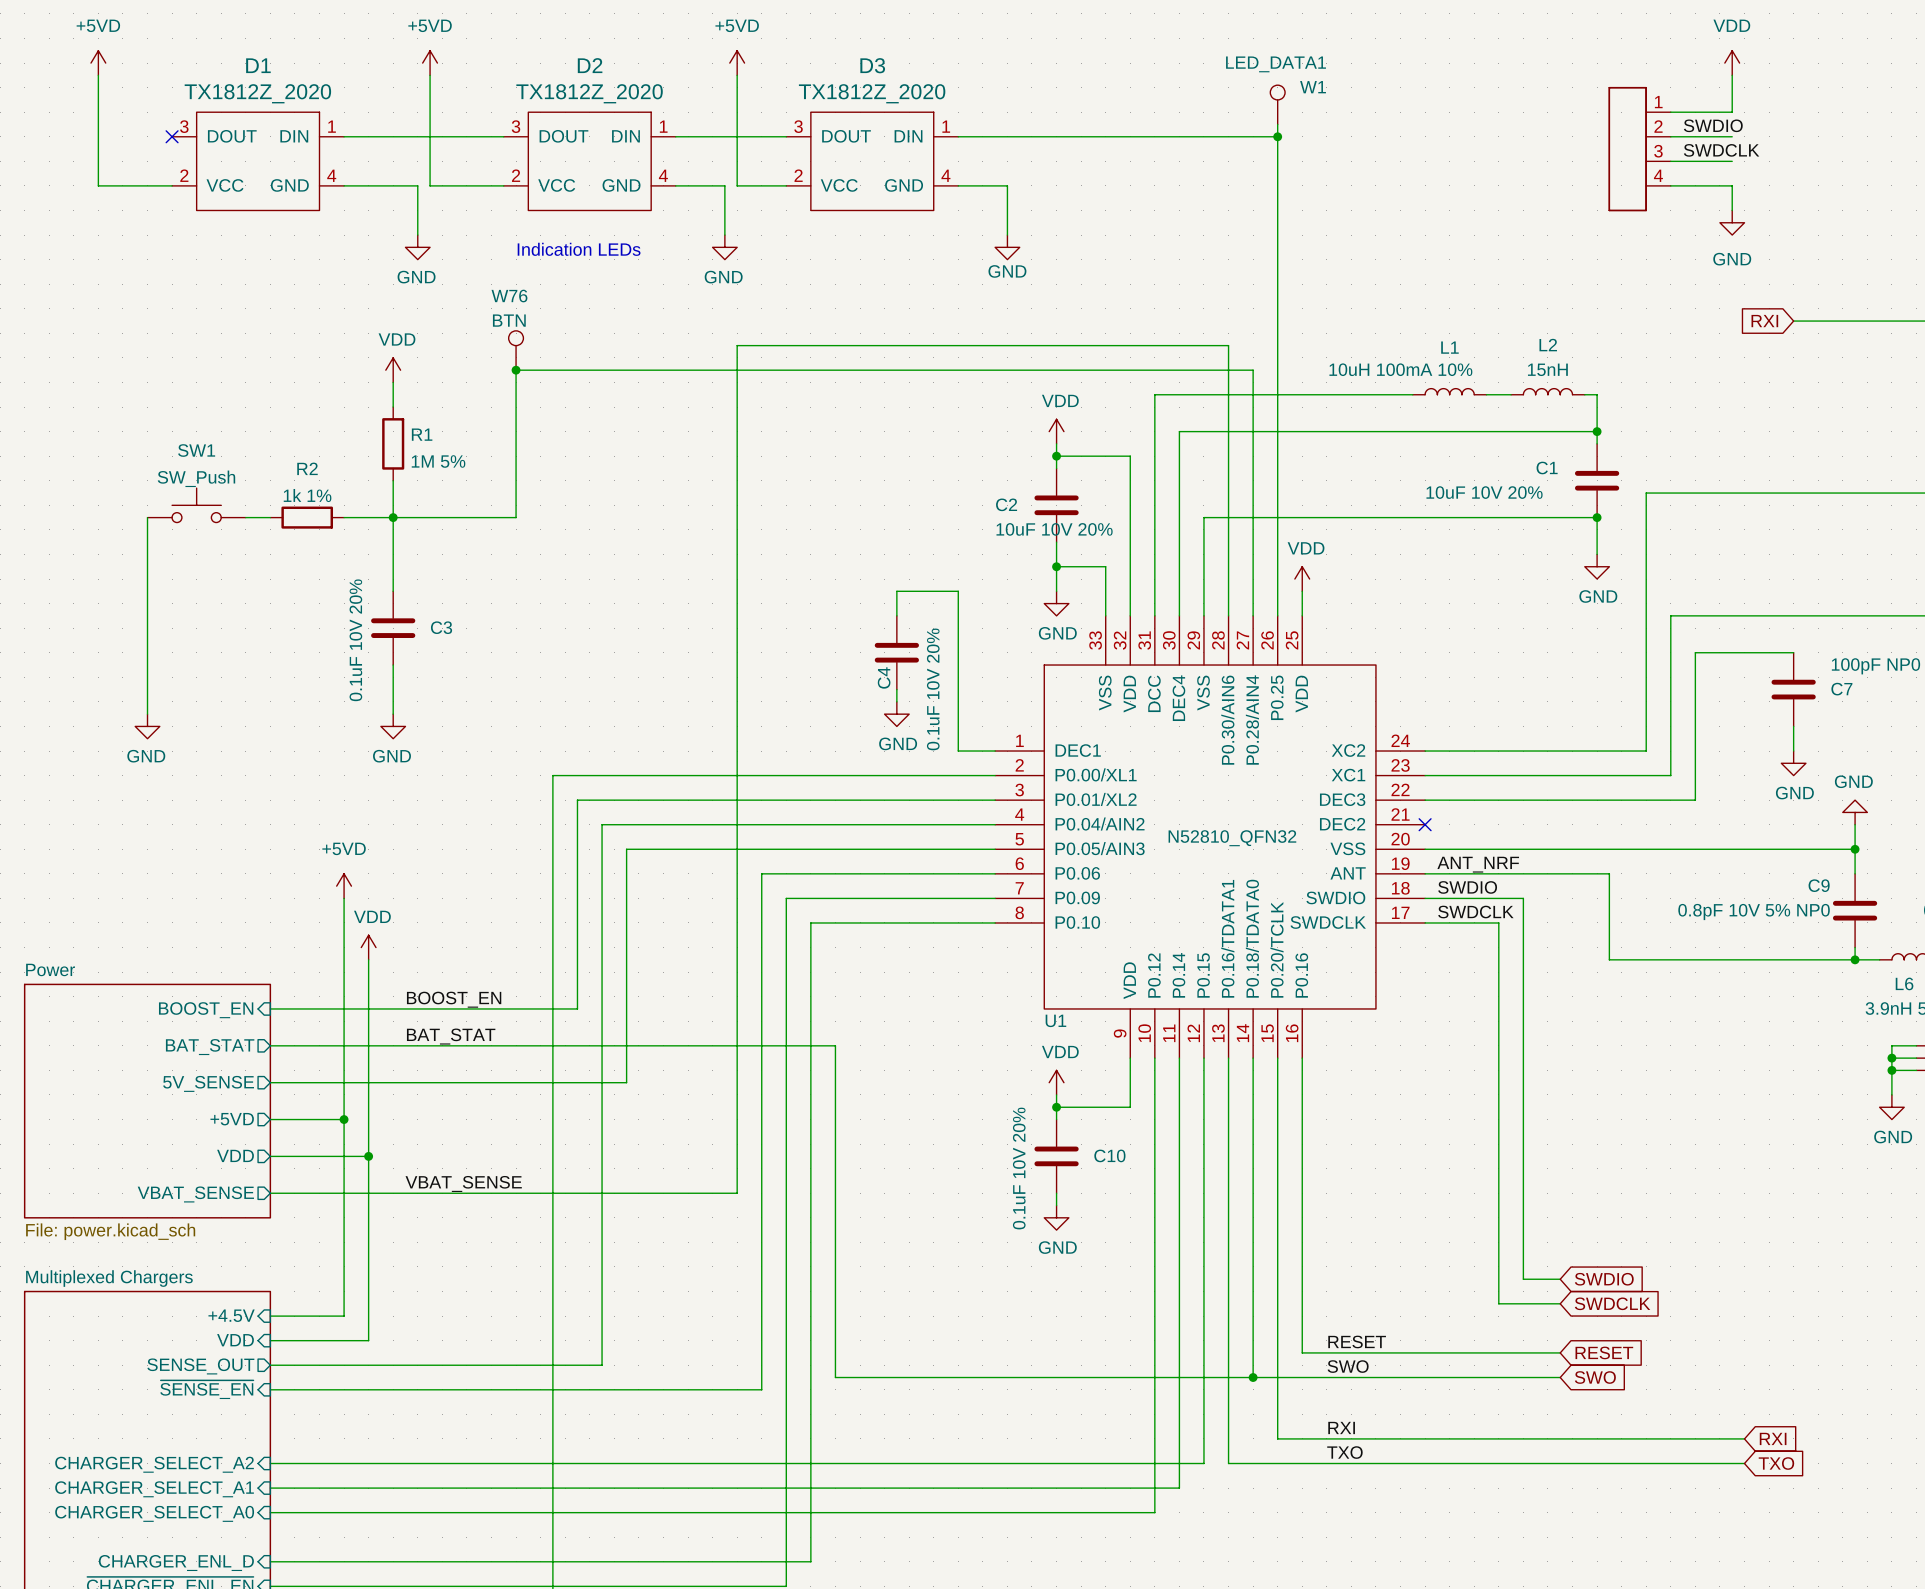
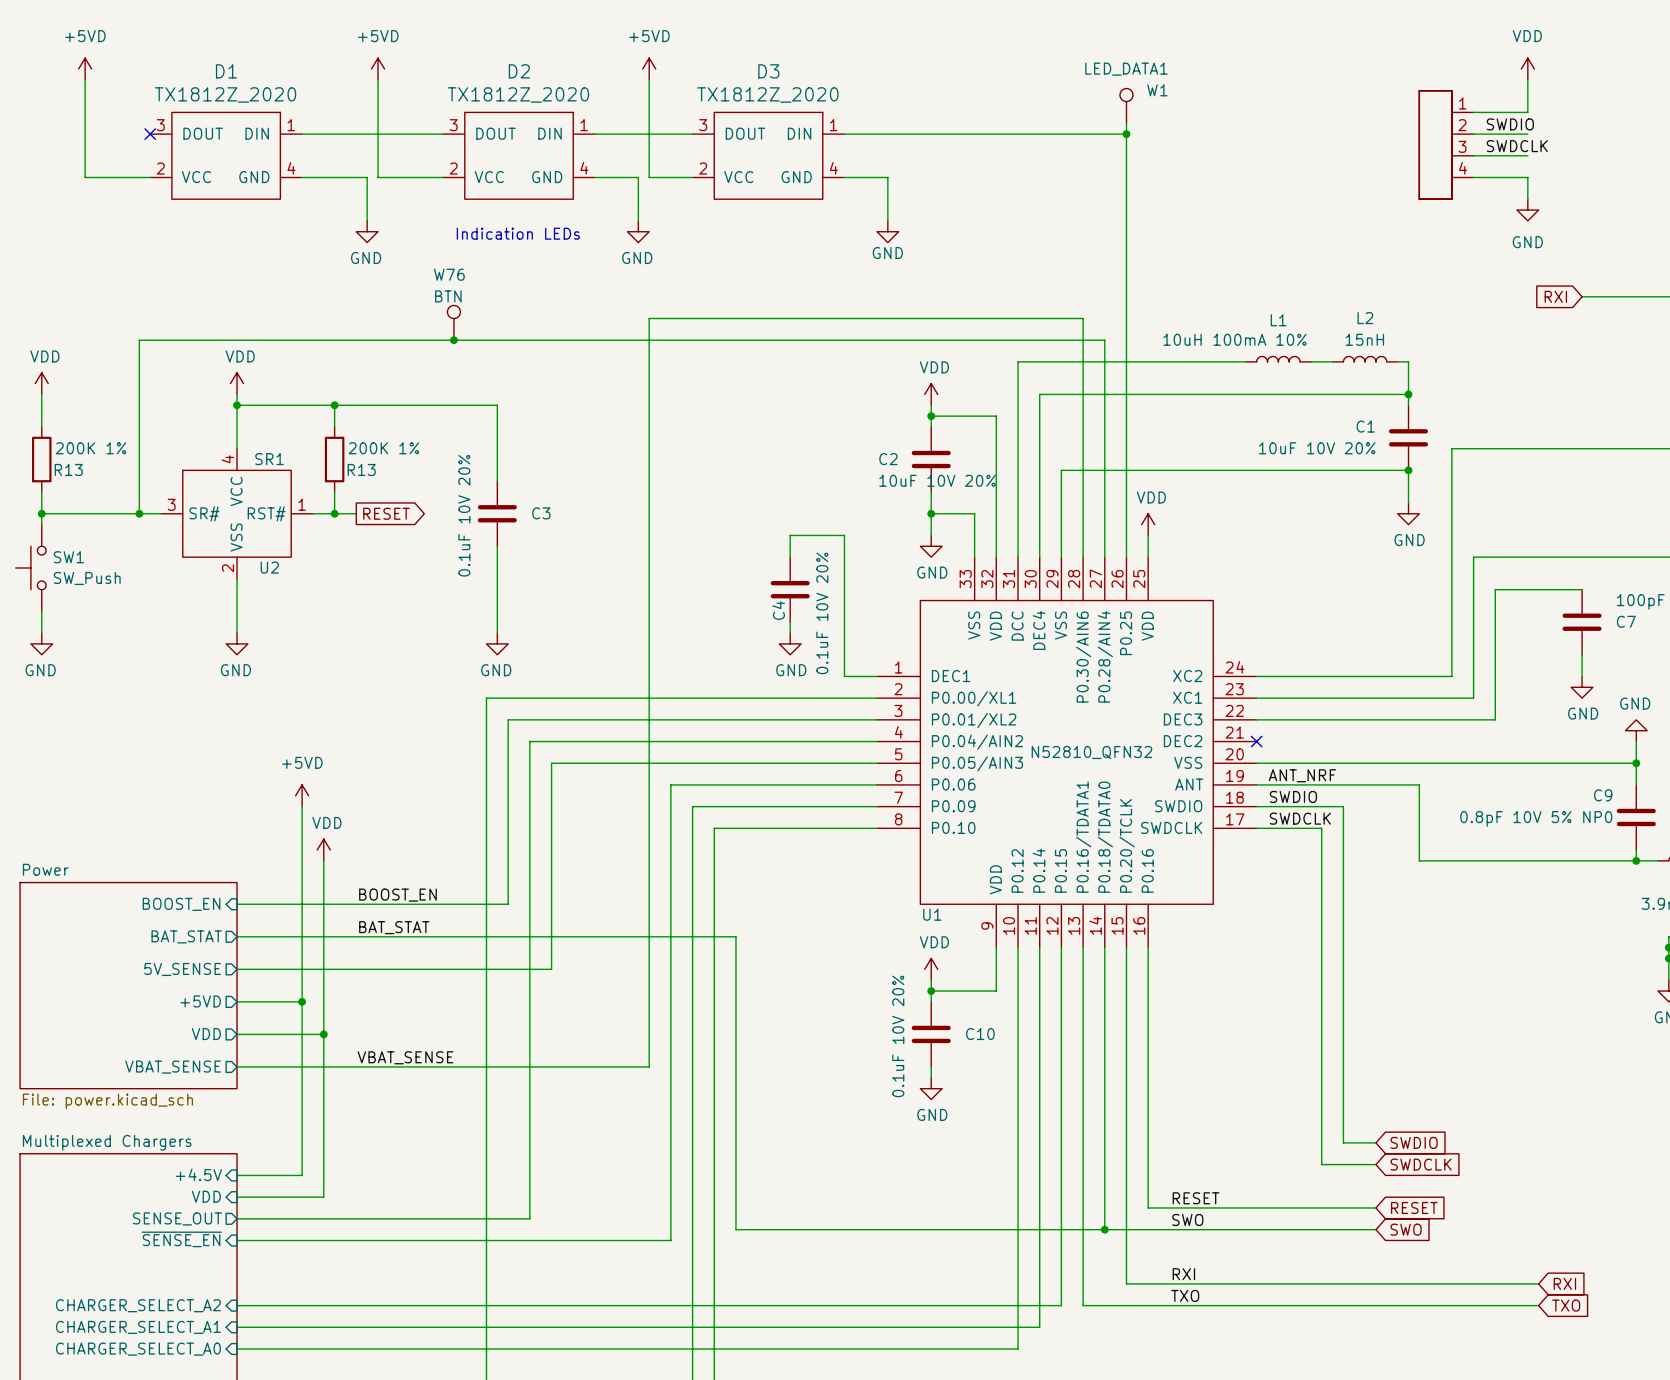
power symbol position: VDD (393, 370) -> VDD (237, 383)
wire: (516, 370) (516, 517) (344, 517) -> (453, 340) (139, 340) (139, 513)
wire: (393, 382) (393, 407) -> (334, 405) (334, 426)
power symbol: none -> VDD (41, 383)
wire: none -> (41, 394) (41, 426)
wire: none -> (237, 394) (237, 448)
wire: none -> (237, 405) (497, 405) (497, 481)
junction: none -> (237, 405)
junction: none -> (334, 405)
R1: 1M 5% (393, 443) -> none
SW1 name position: SW1 (196, 450) -> SW1 (68, 557)
SW1 value position: SW_Push (196, 478) -> SW_Push (87, 578)
wire: (393, 480) (393, 591) -> none
R13: none -> 200K 1% (41, 459)
SW1 rotation: 0° (196, 505) -> 90° counterclockwise (30, 567)
SW1 position: (196, 505) -> (30, 567)
R13: none -> 200K 1% (334, 459)
wire: (147, 517) (147, 714) -> none
R2: 1k 1% (307, 517) -> none
junction: (393, 517) -> none
wire: none -> (41, 492) (41, 524)
wire: none -> (334, 492) (334, 513)
wire: none -> (41, 513) (161, 513)
junction: none -> (41, 513)
junction: none -> (139, 513)
U2: none -> SR1 (237, 513)
wire: none -> (312, 513) (356, 513)
junction: none -> (334, 513)
global label: none -> RESET (386, 513)
wire: none -> (497, 546) (497, 633)
C3 position: (393, 628) -> (497, 513)
wire: none -> (237, 578) (237, 633)
wire: (393, 665) (393, 714) -> none
wire: none -> (41, 611) (41, 633)
power symbol: none -> GND (41, 643)
power symbol: none -> GND (237, 643)
power symbol: none -> GND (497, 643)
power symbol: GND (147, 726) -> none
power symbol: GND (393, 726) -> none

